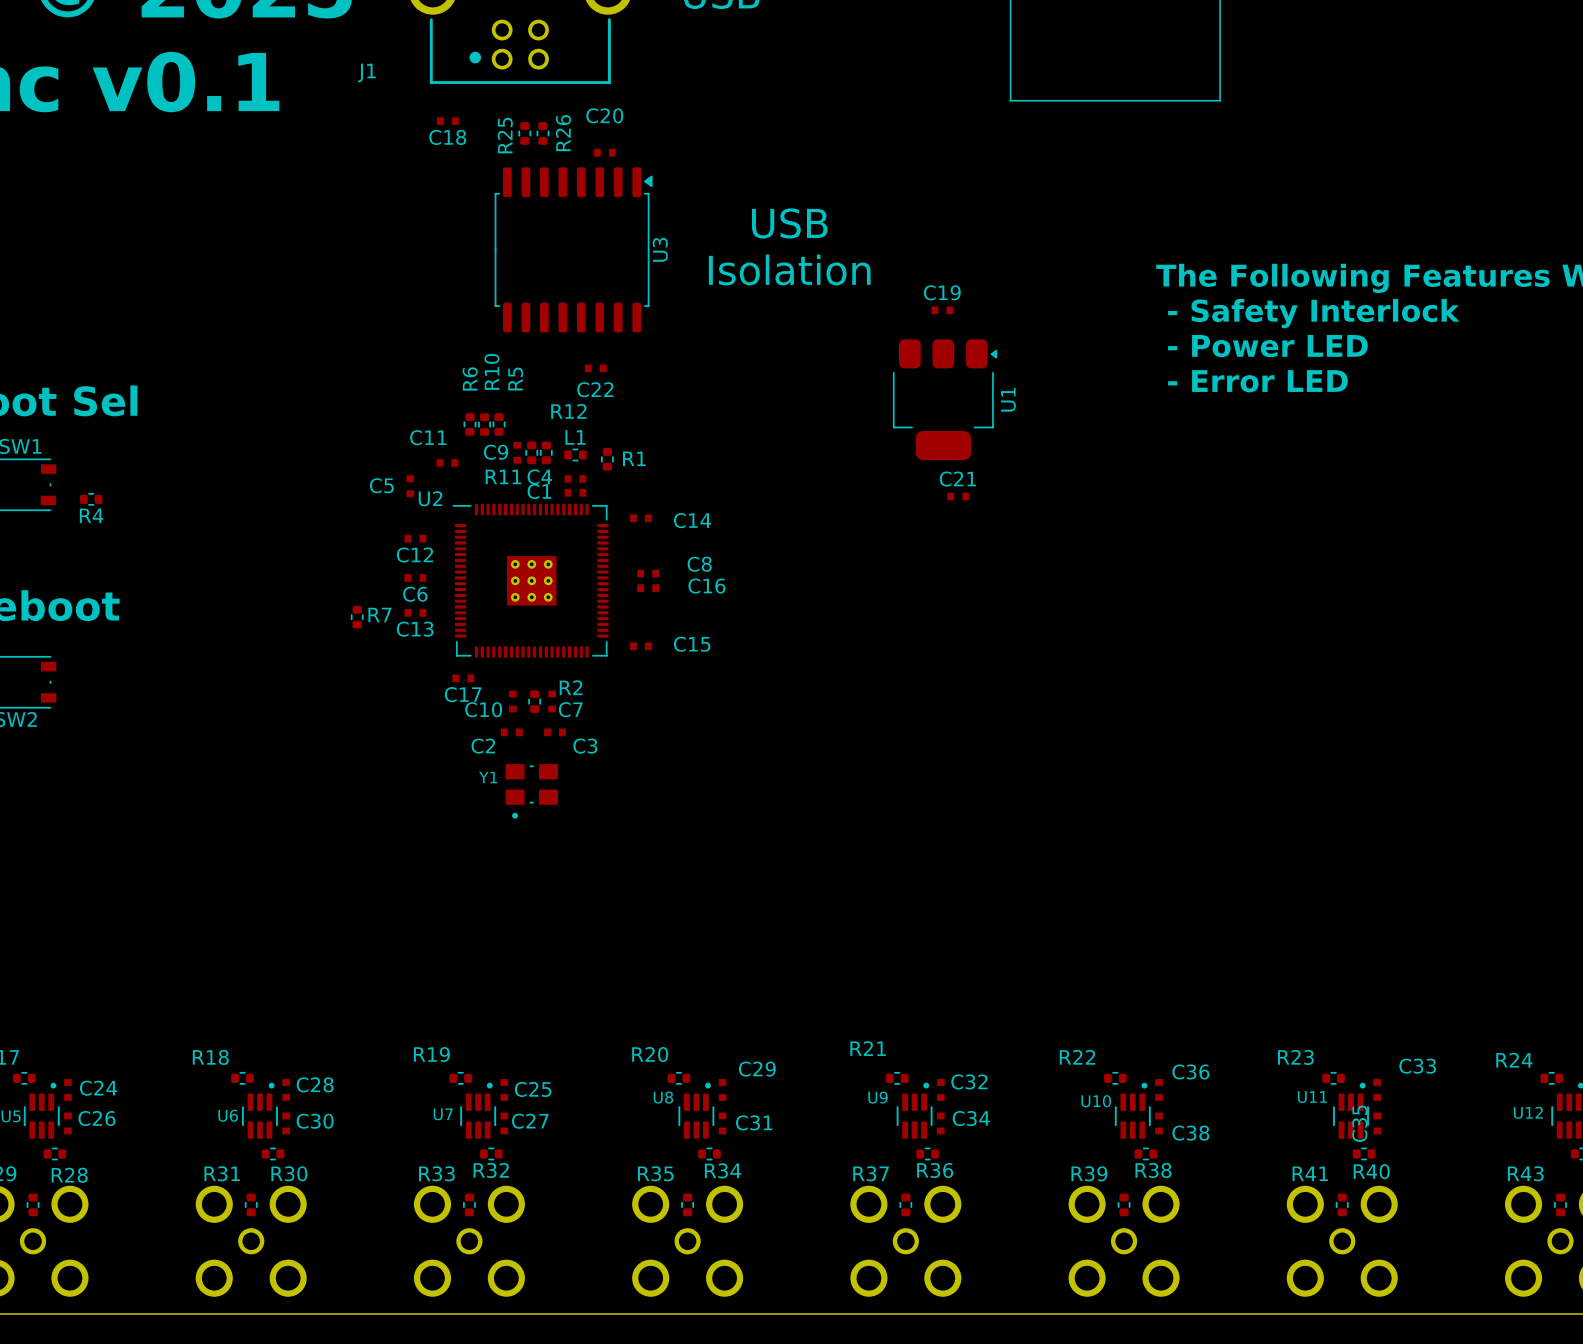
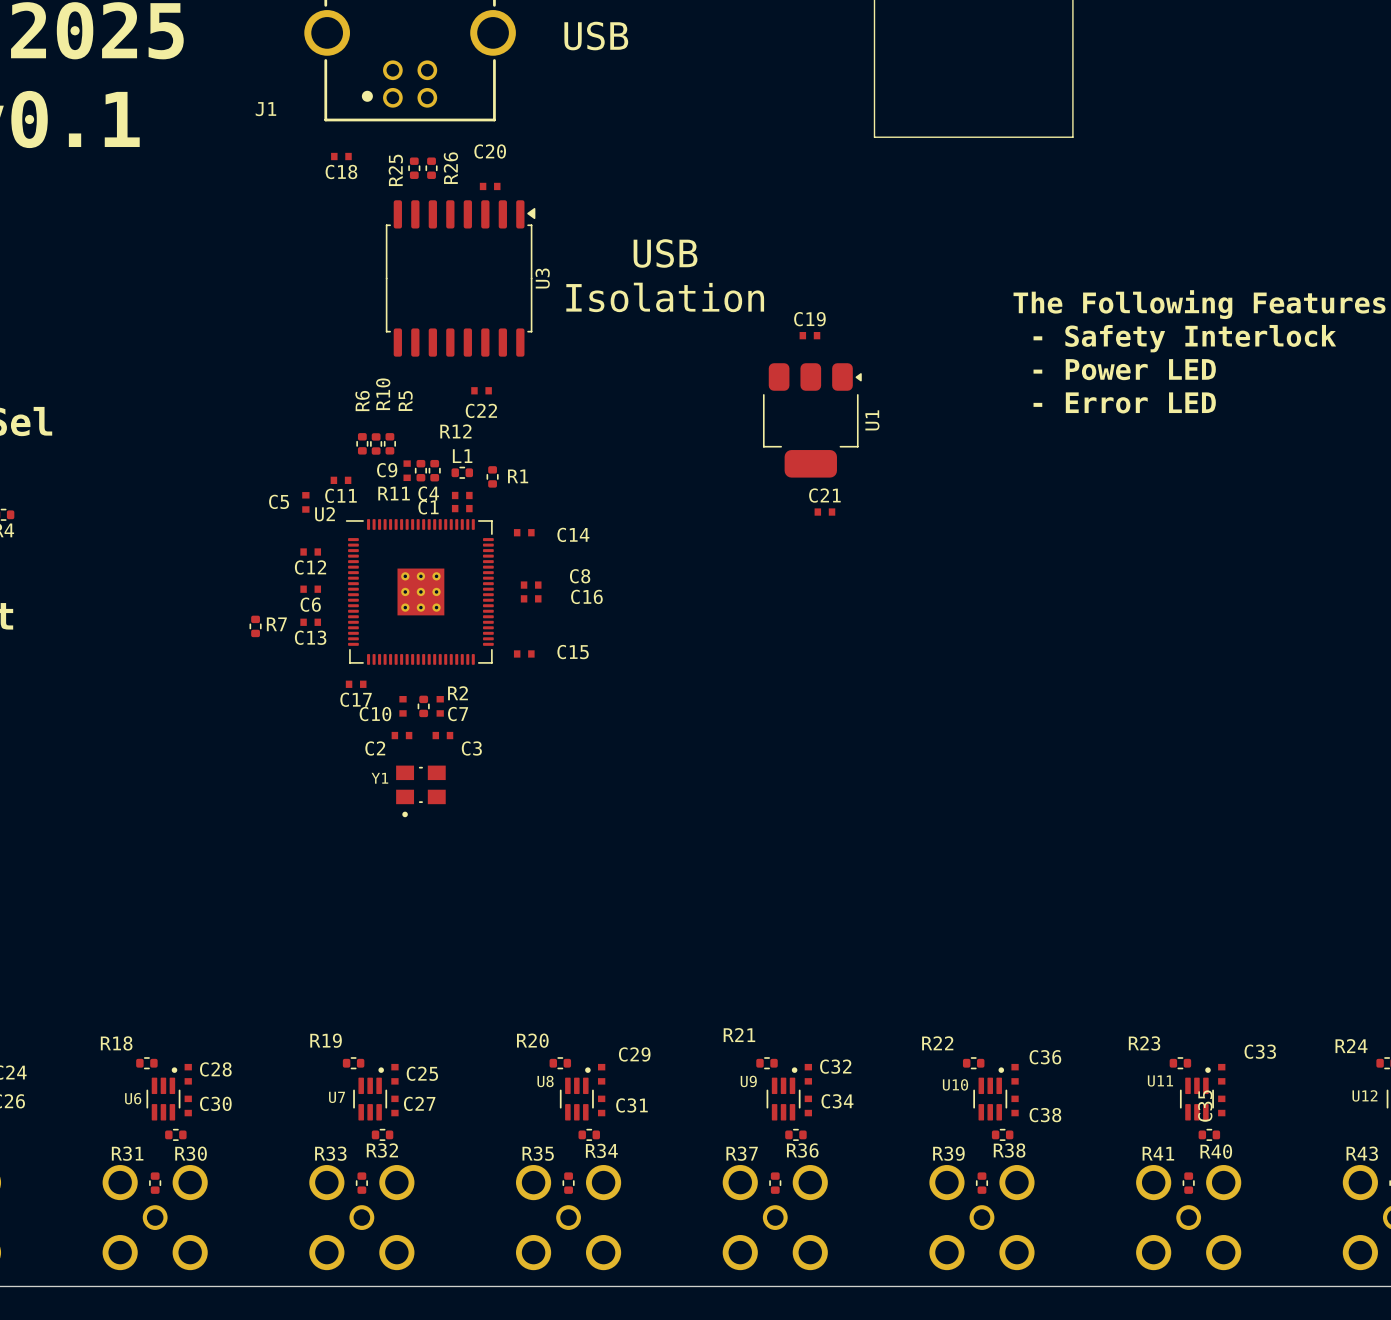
C11 name position: C11 (428, 437) -> C11 (341, 495)

